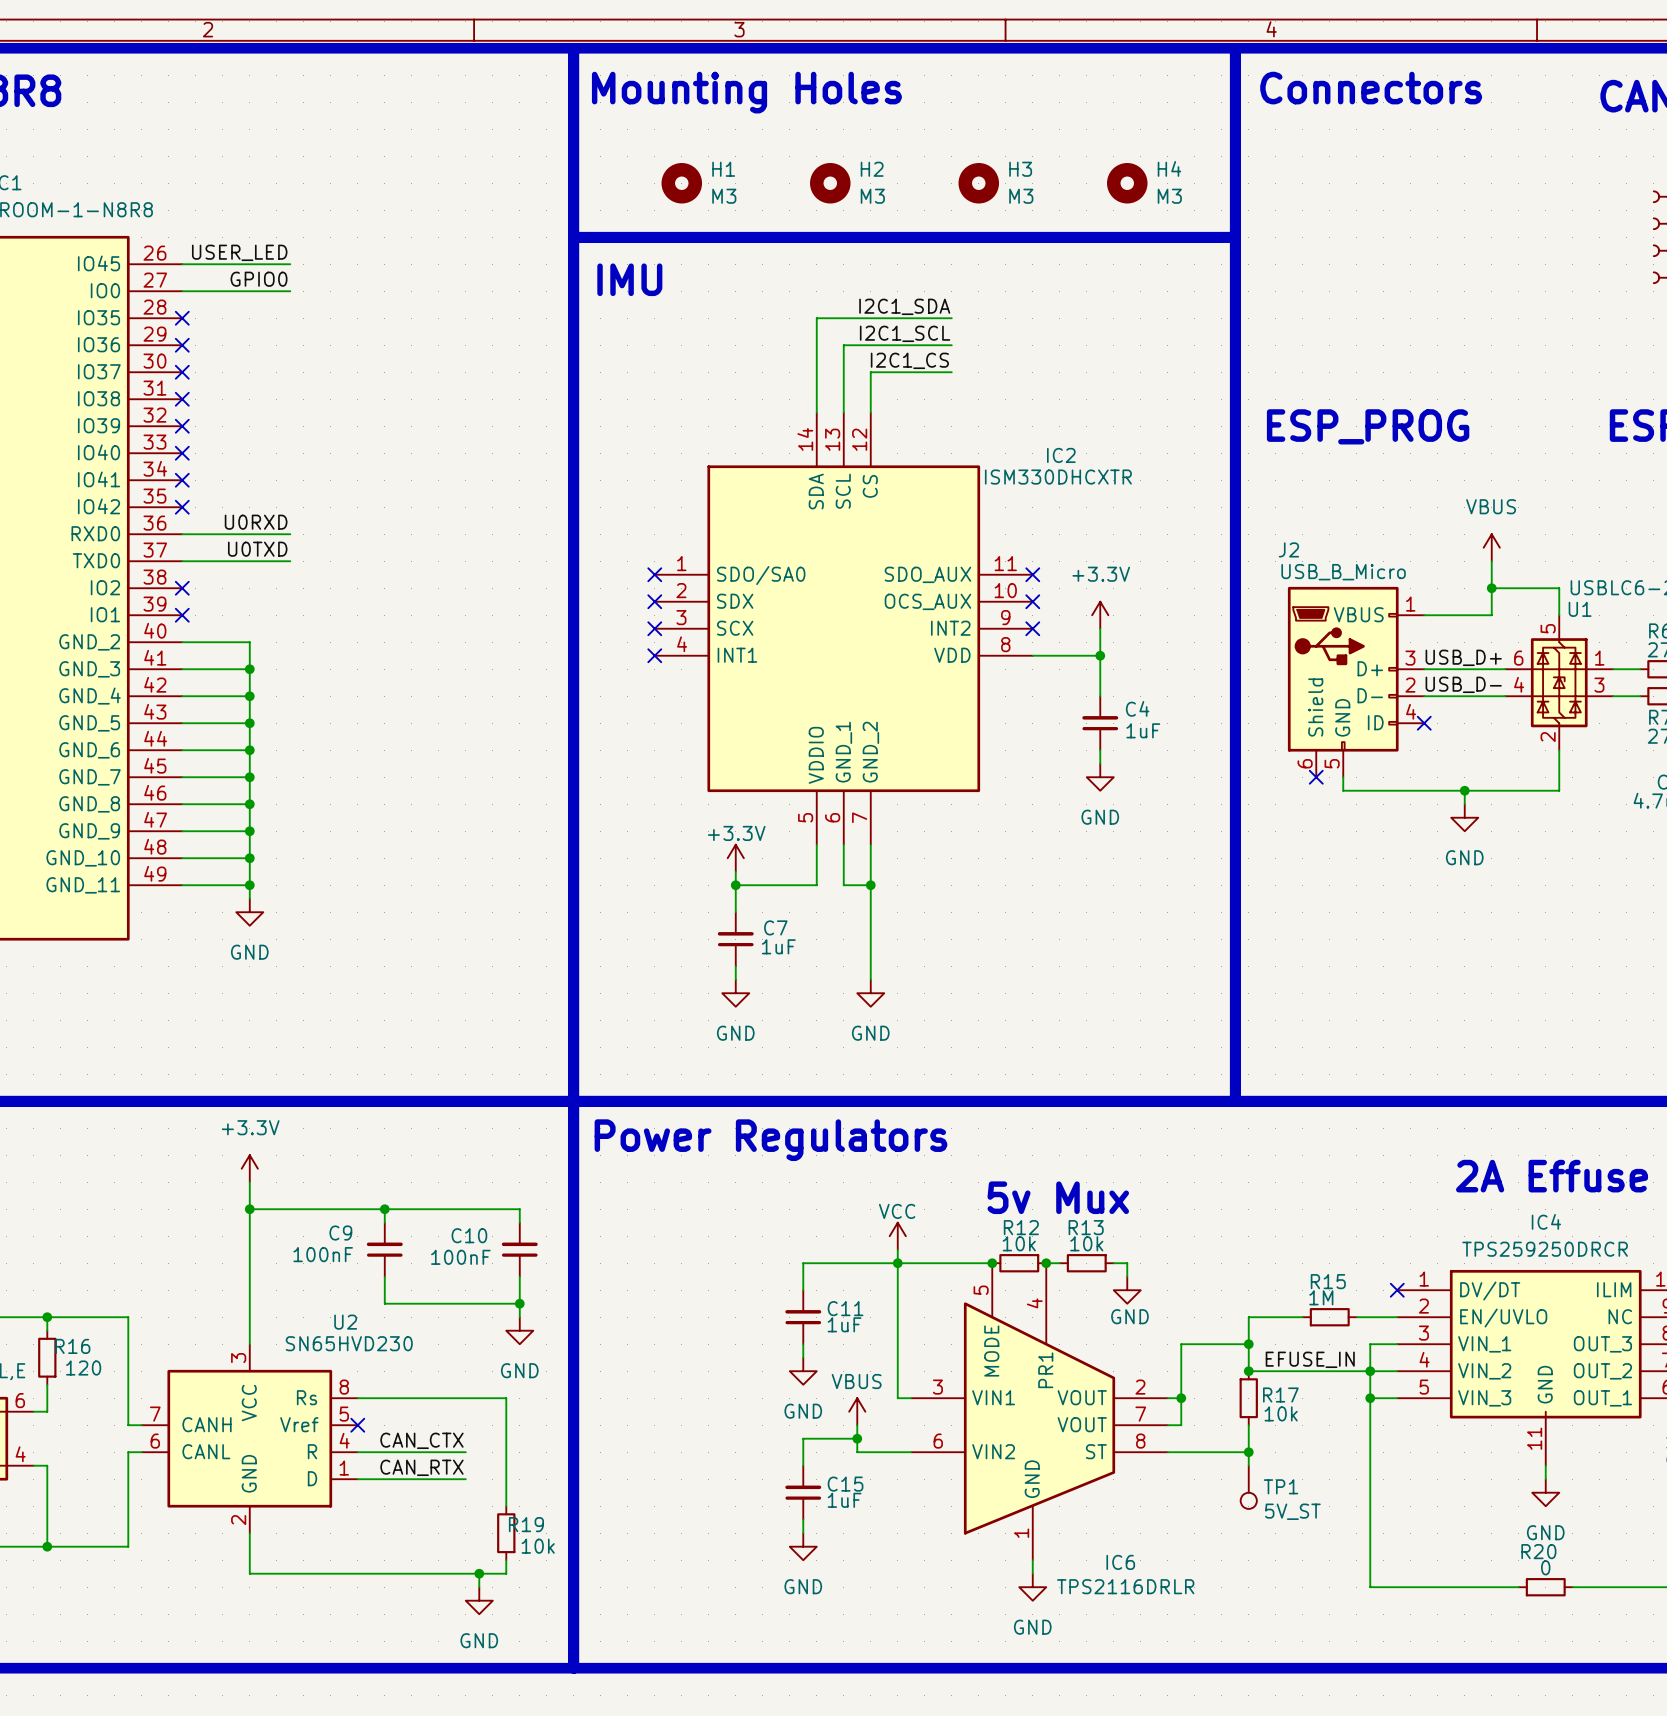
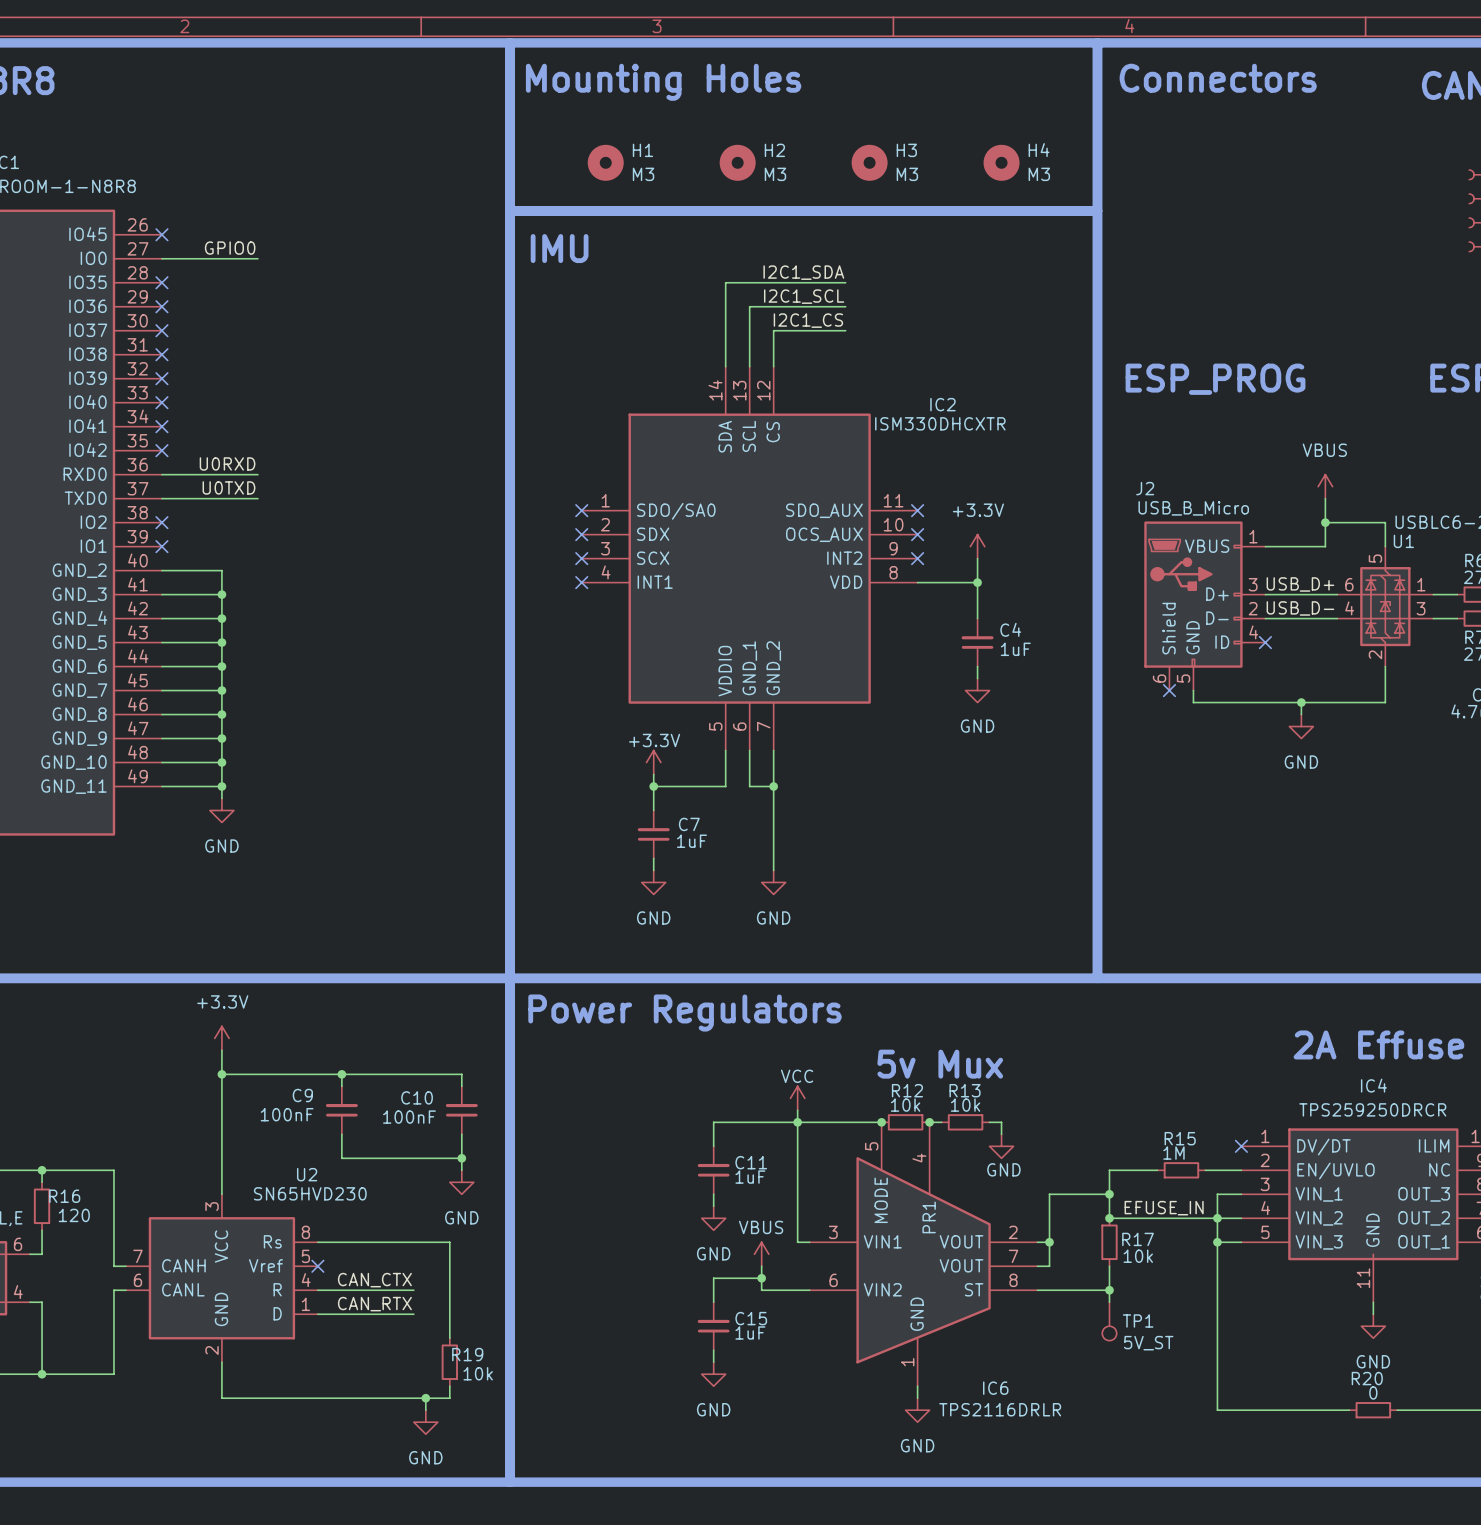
label: USER_LED (239, 252) -> none
wire: (182, 264) (290, 264) -> none
no-connect mark: none -> (161, 234)

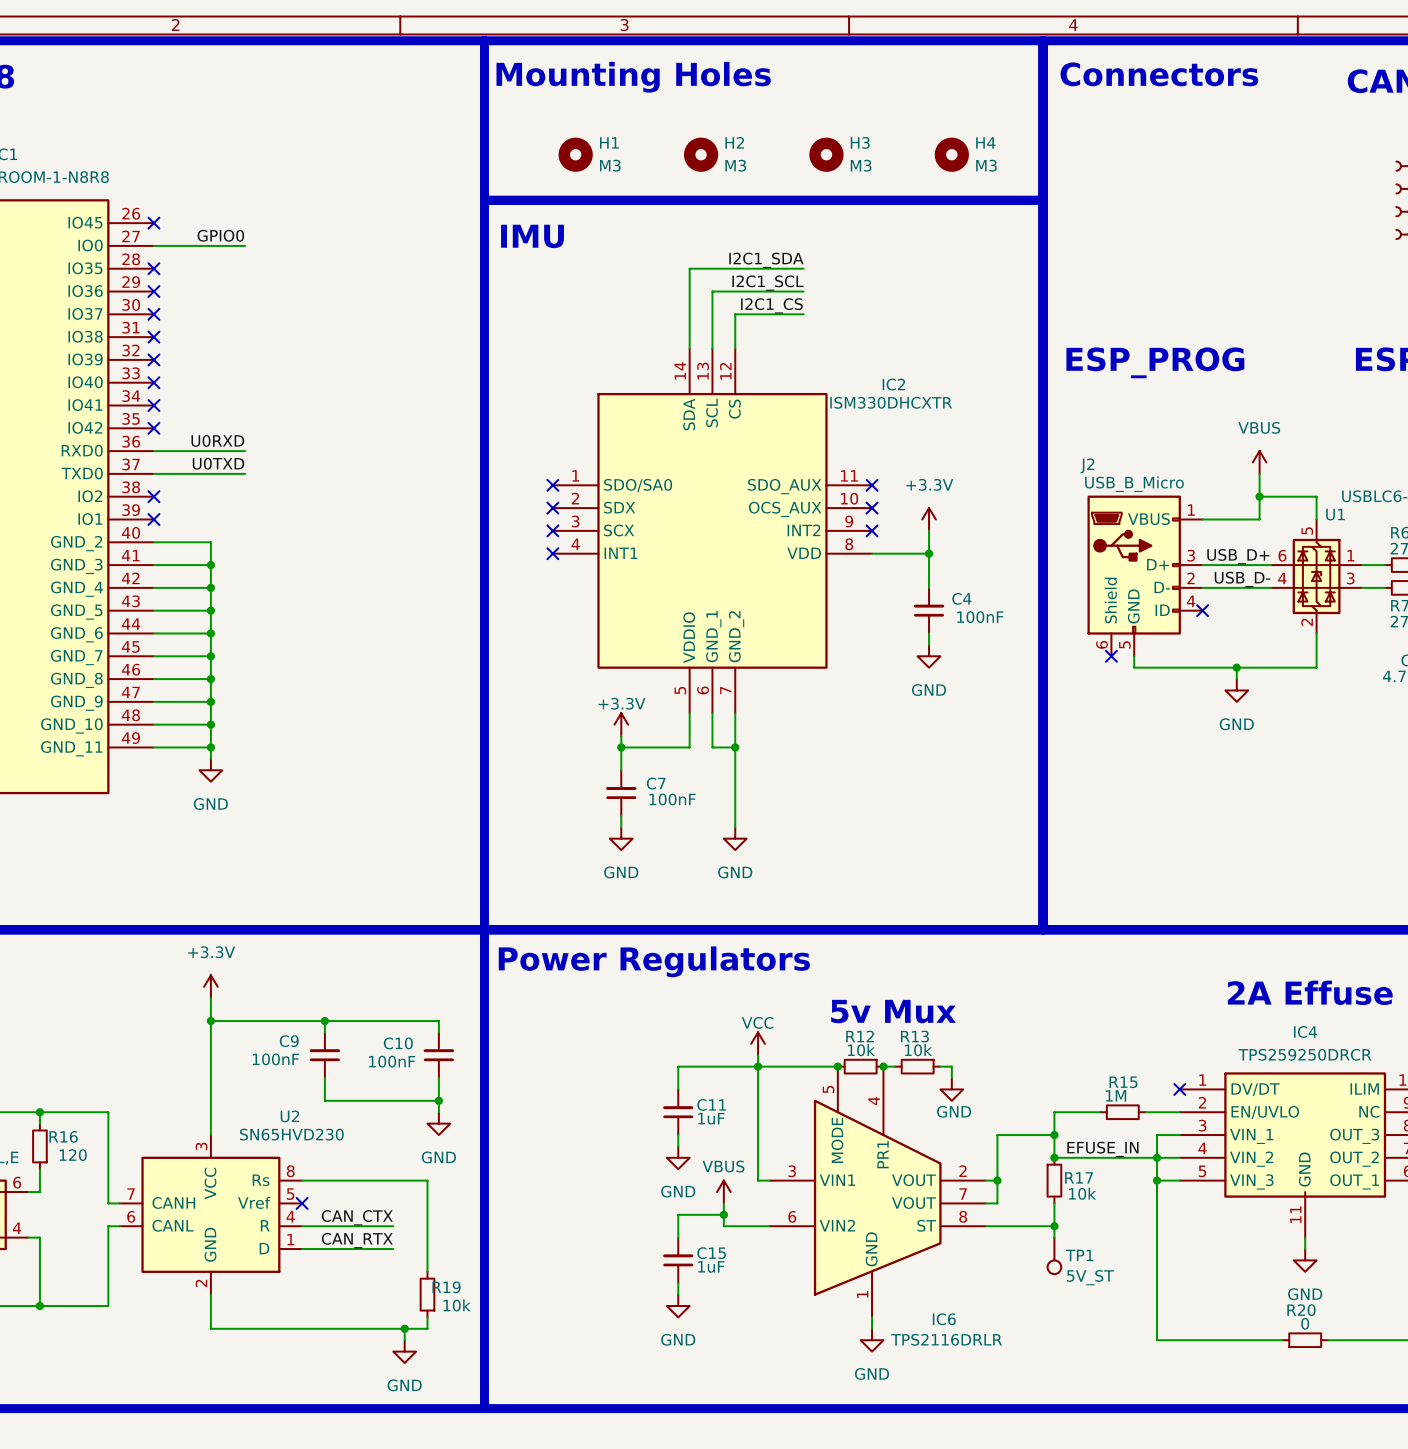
C4 value: 1uF (1015, 649) -> 100nF (980, 617)
C7 value: 1uF (691, 841) -> 100nF (672, 799)

